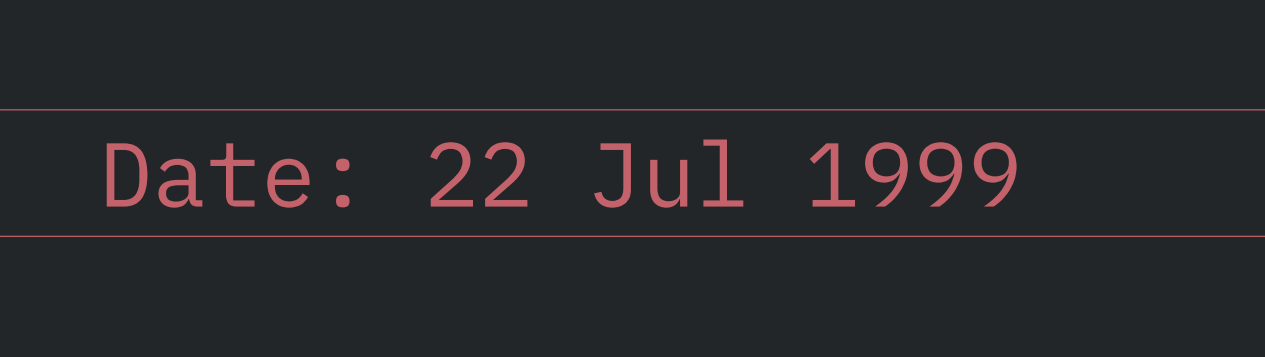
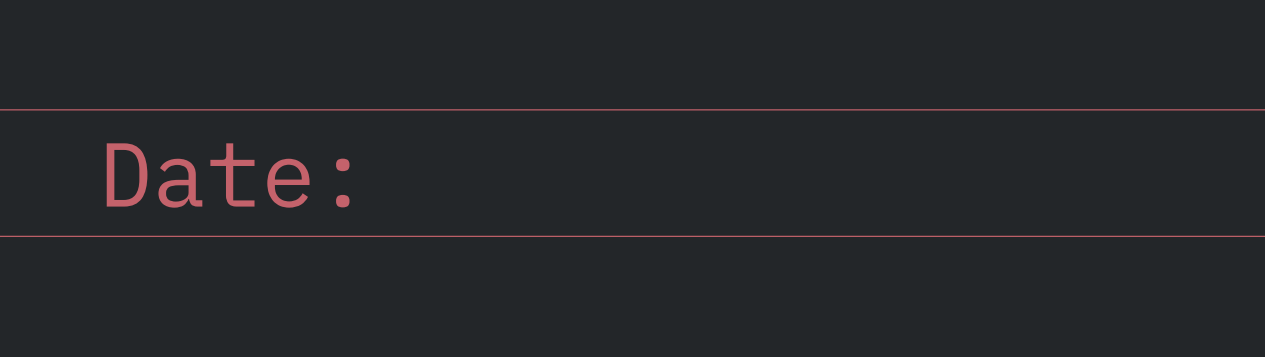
title block: Date: 22 Jul 1999 (561, 173) -> Date: (228, 175)

